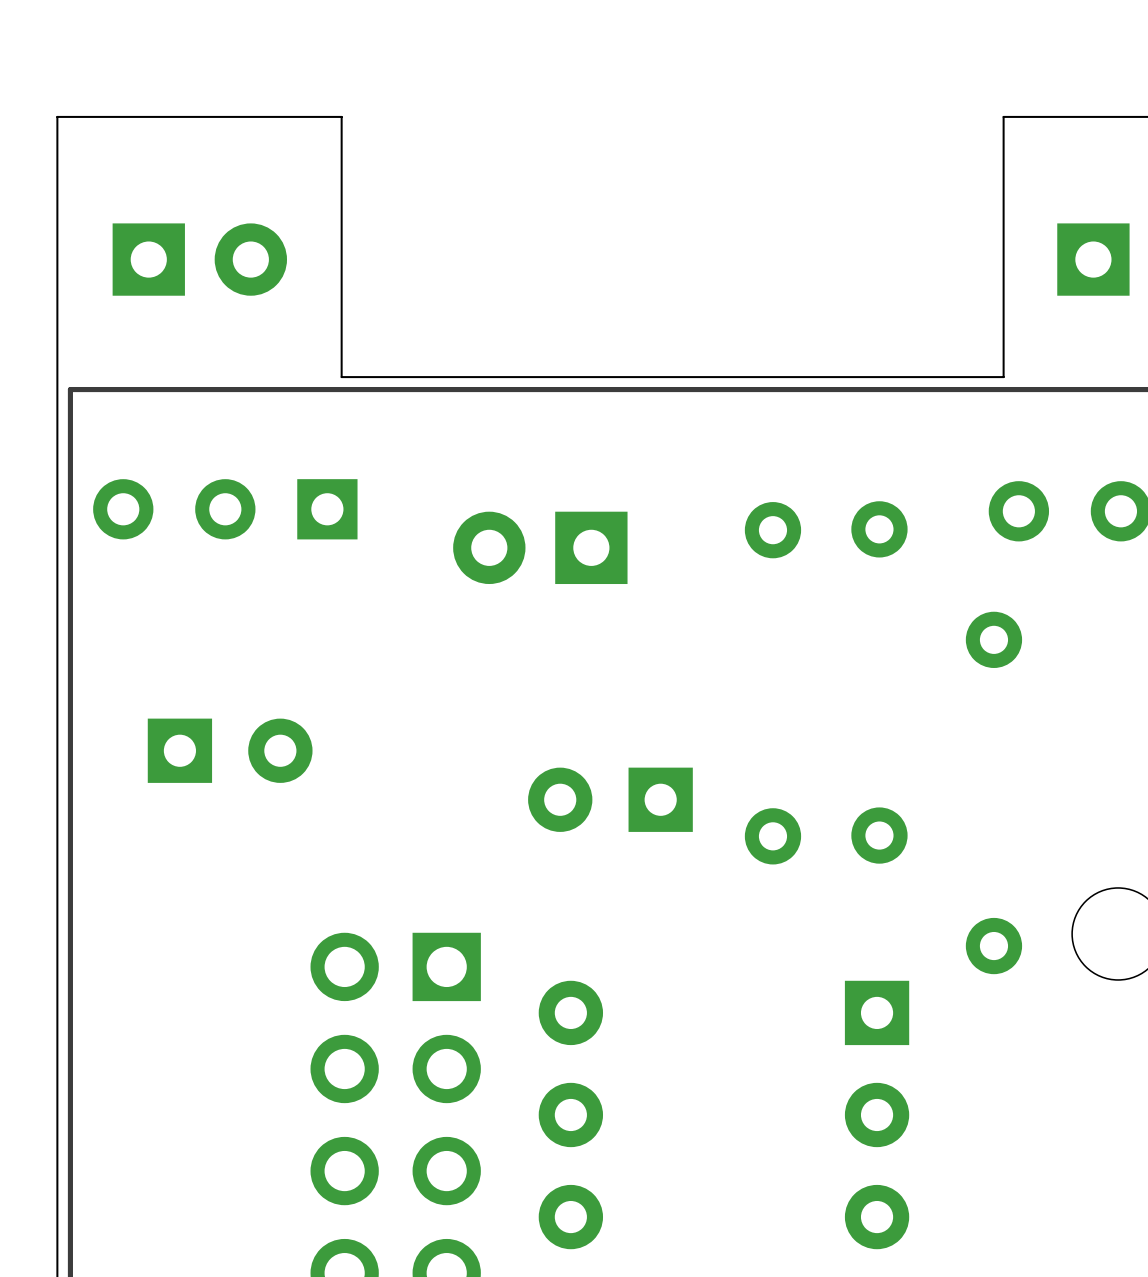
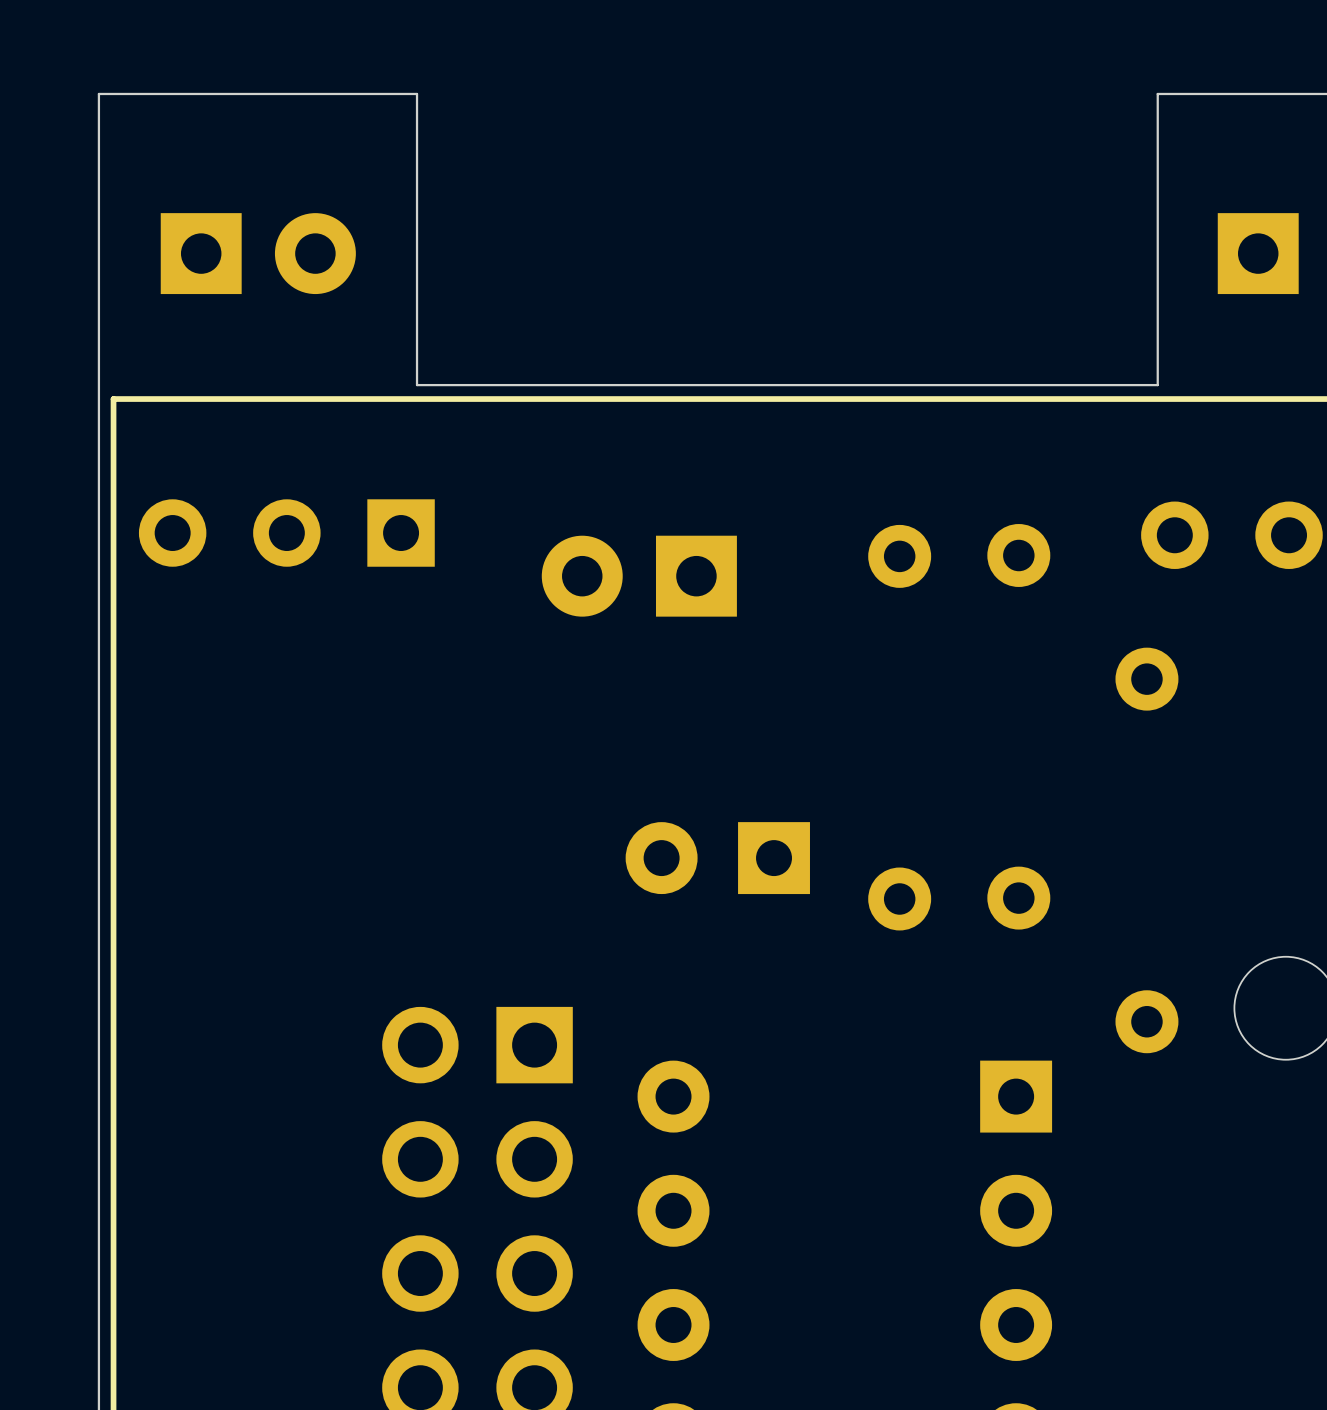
part: (230, 750) -> none

